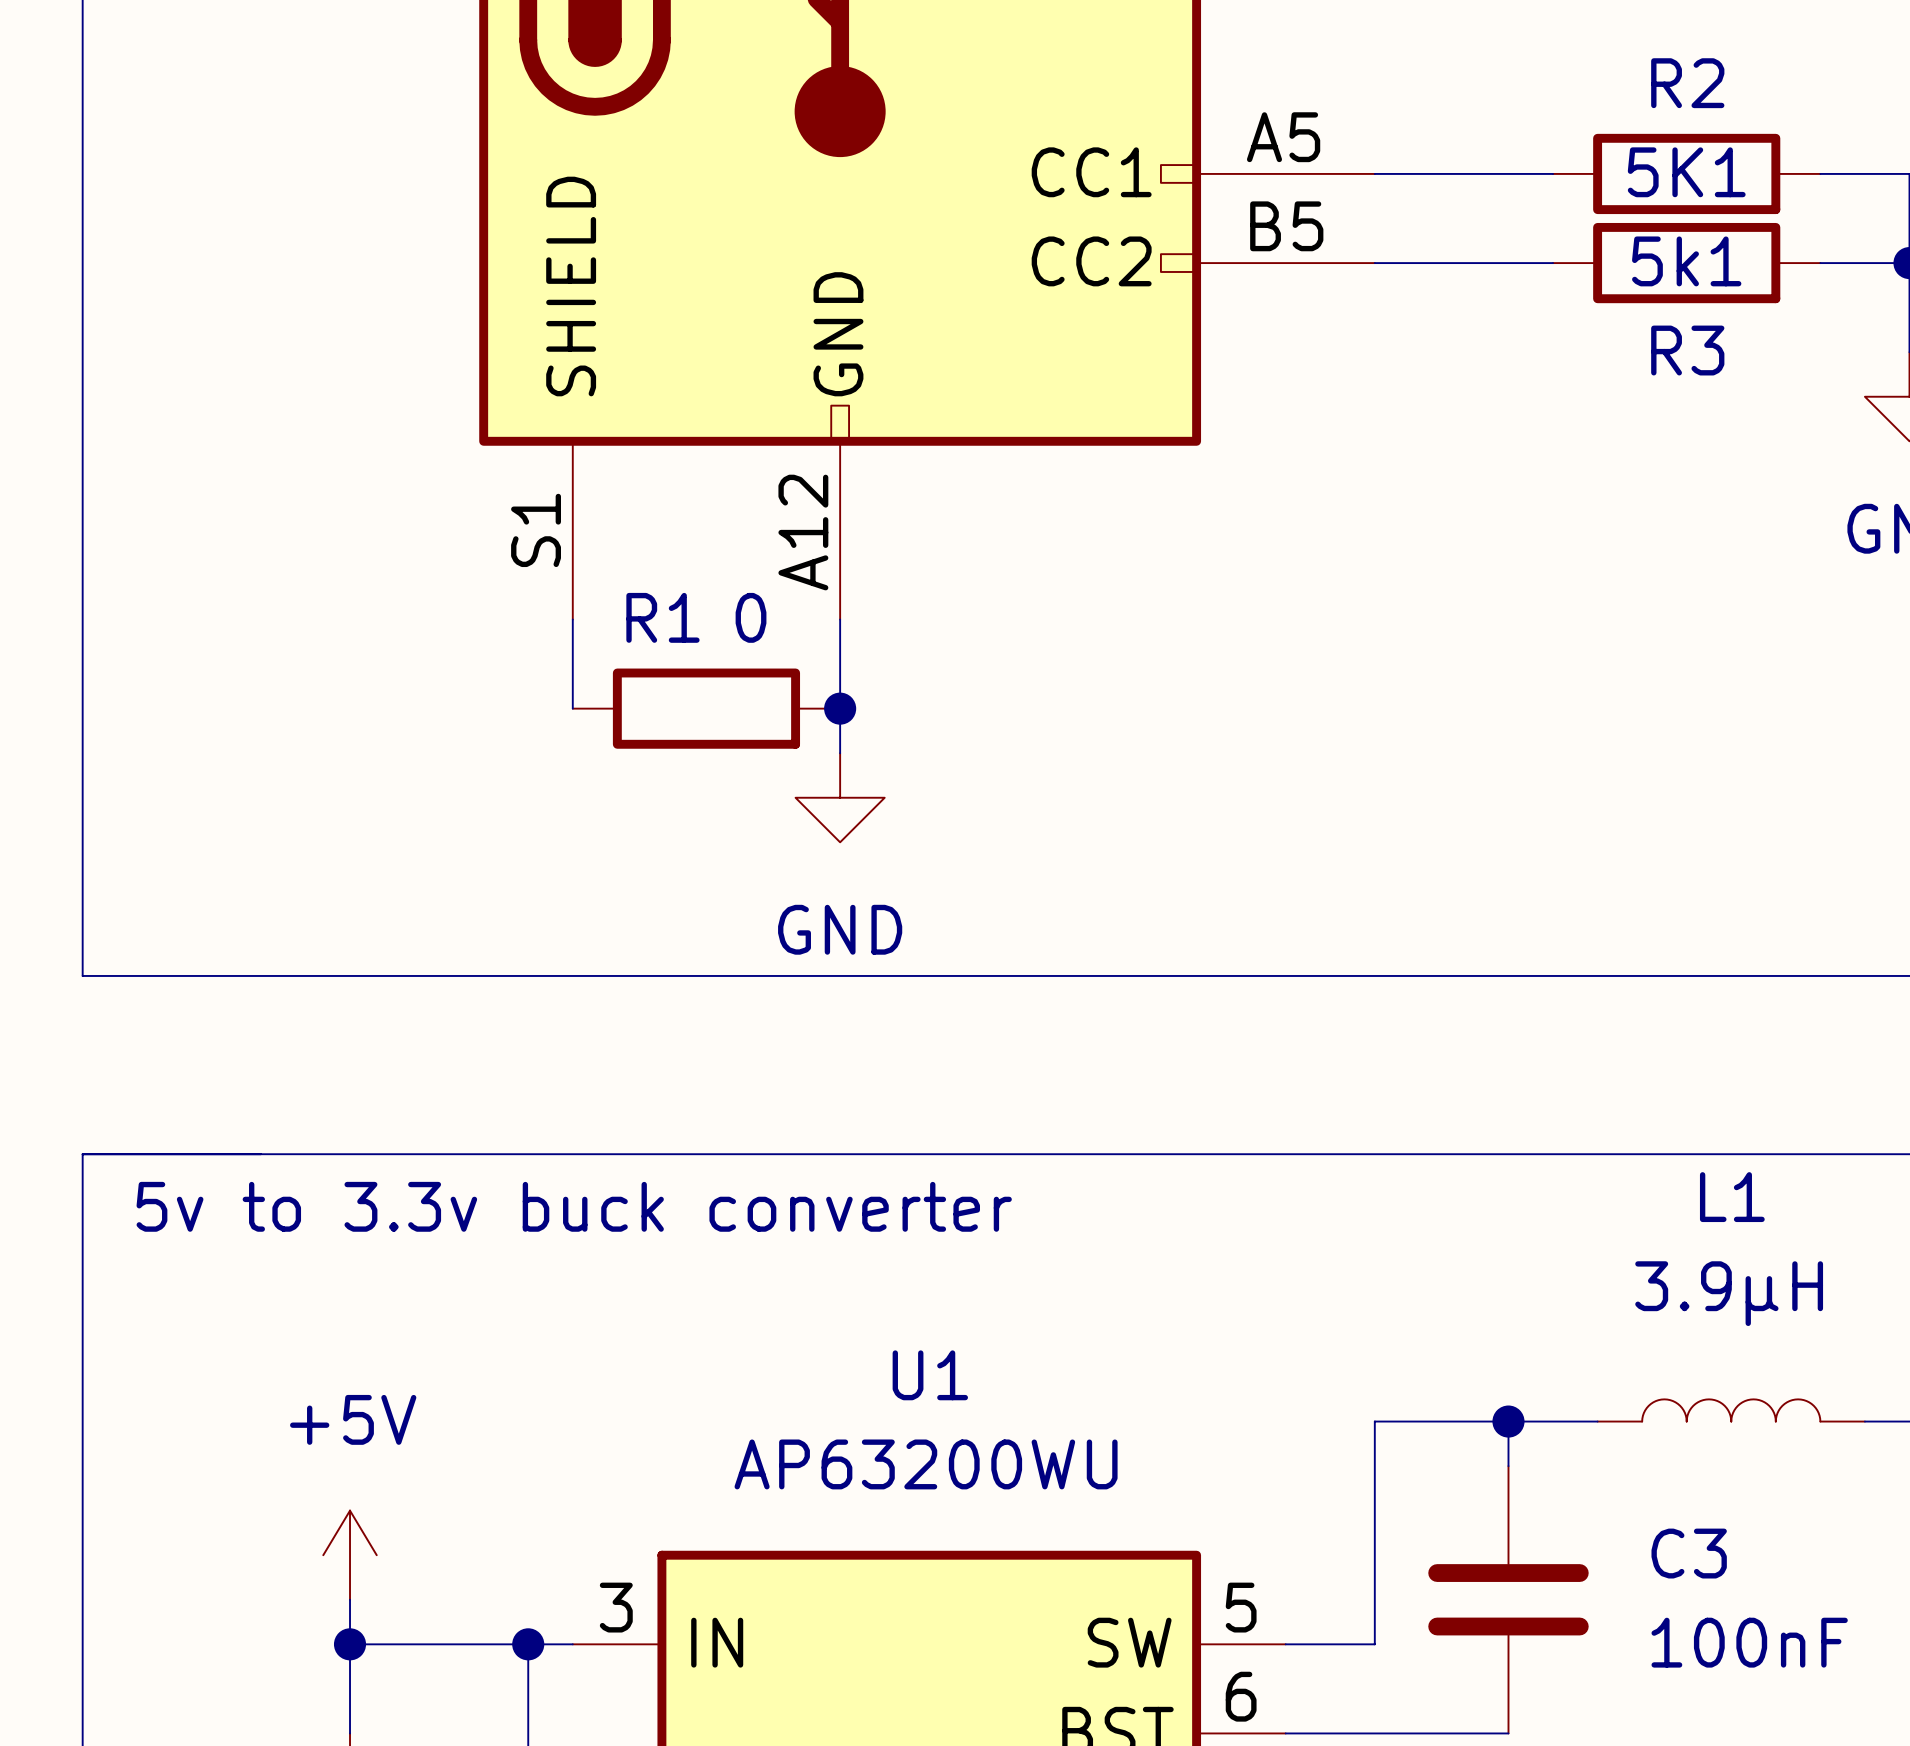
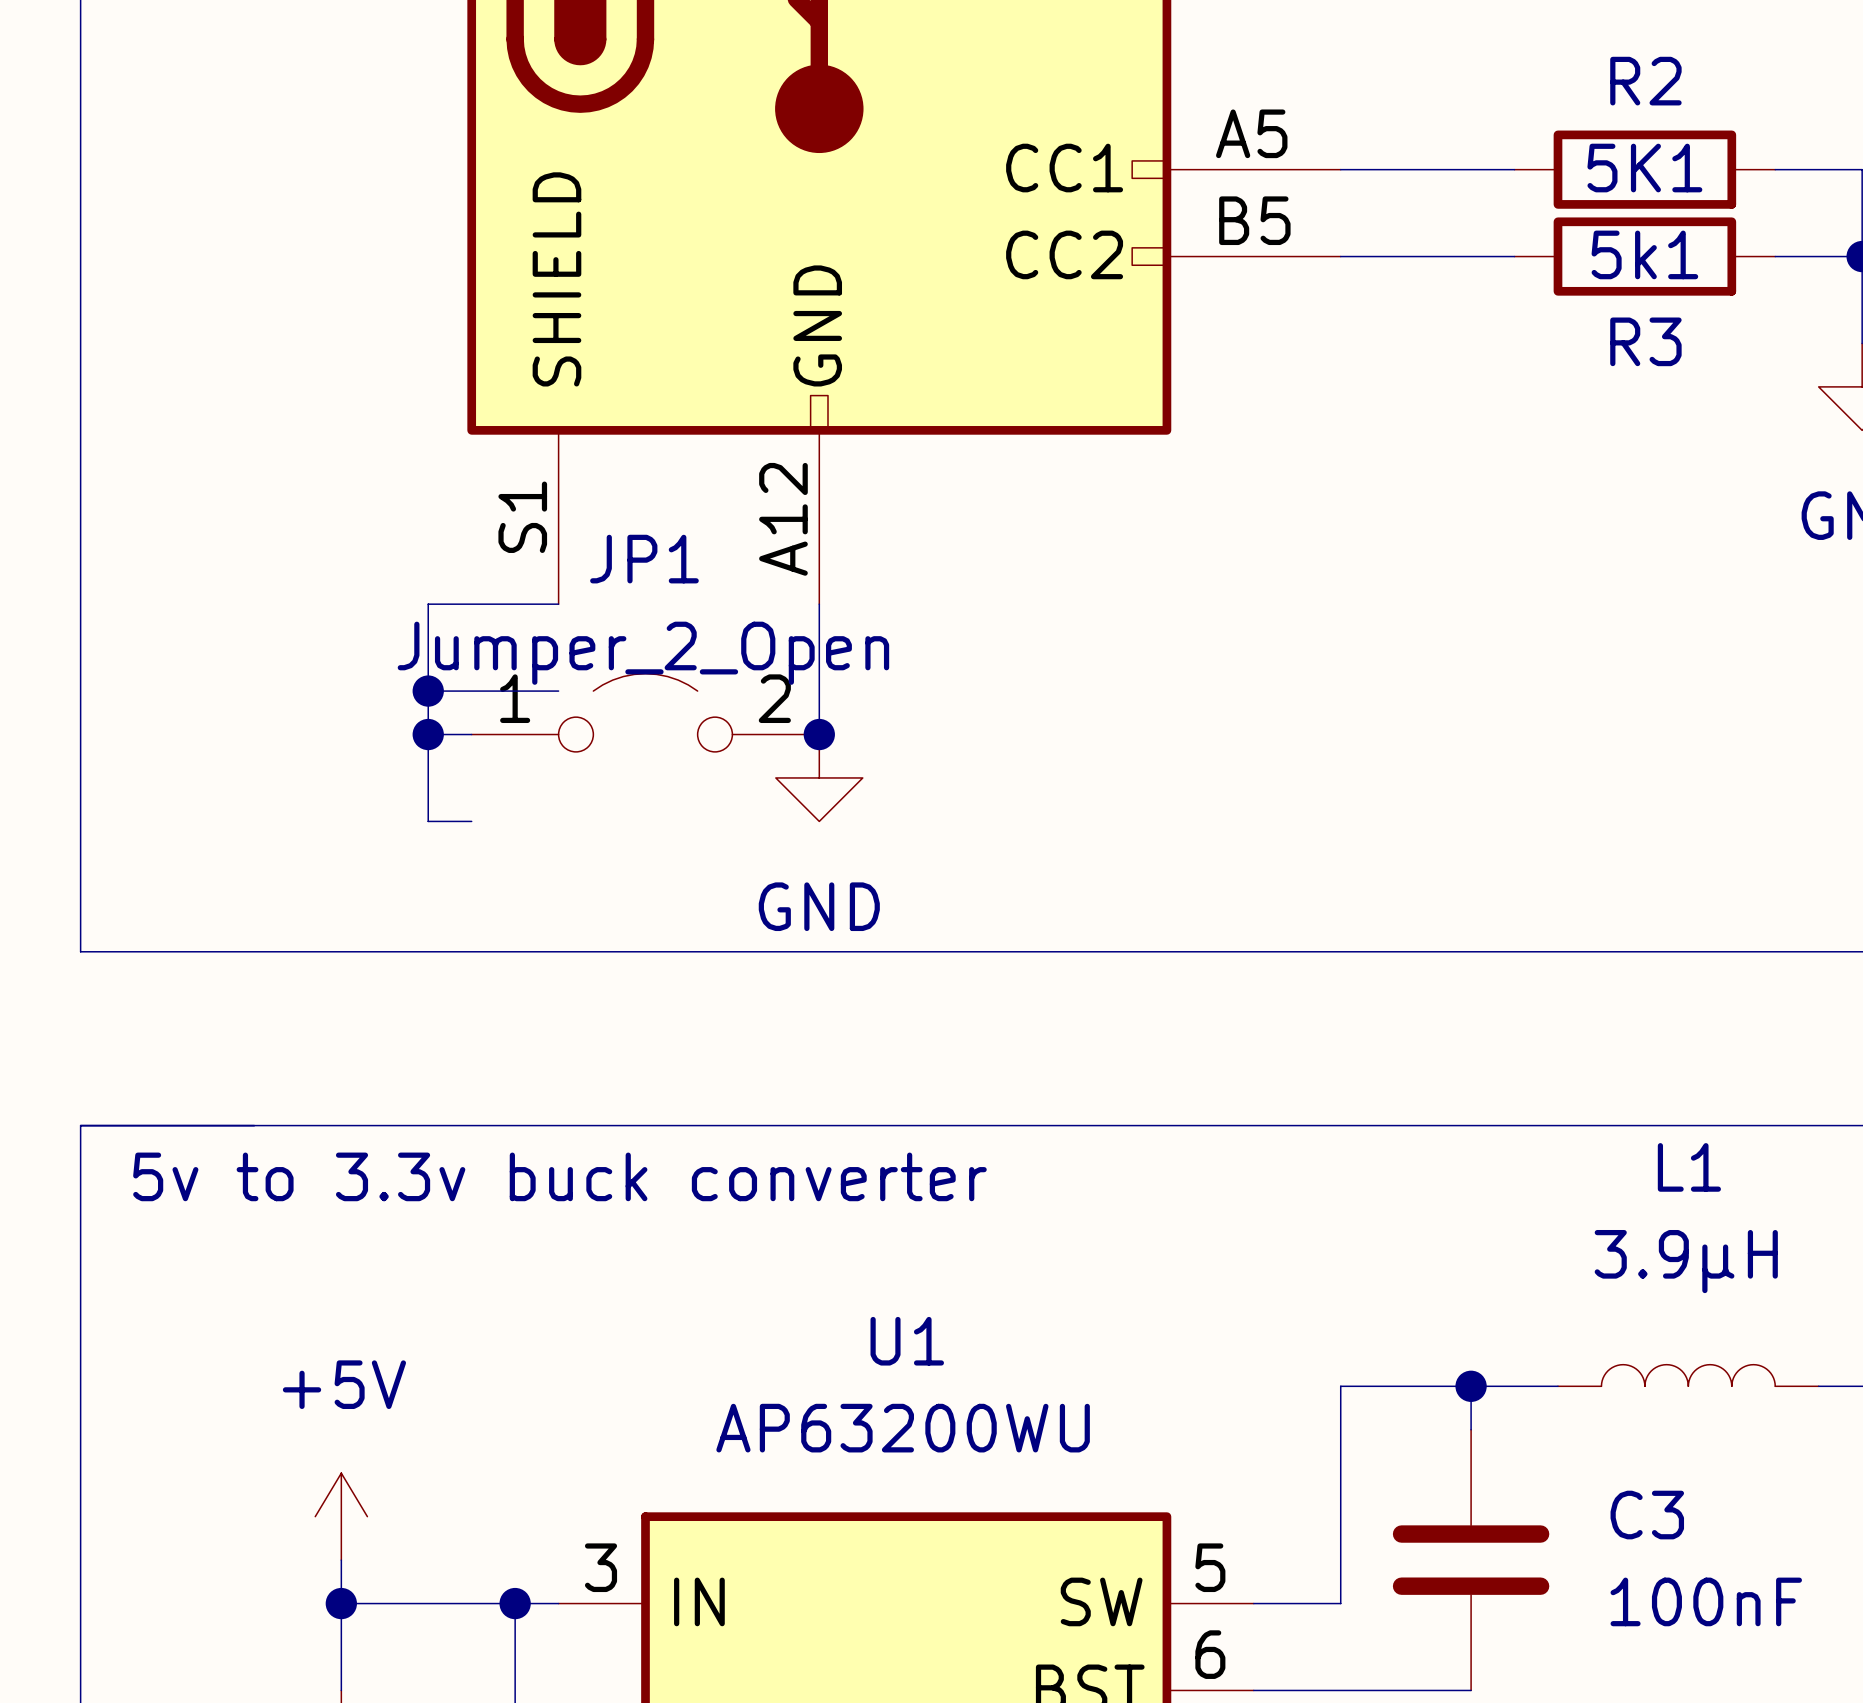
wire: (572, 619) (572, 708) -> (558, 604) (428, 604) (428, 821) (471, 821)
wire: none -> (428, 691) (558, 691)
junction: none -> (428, 691)
R1: 0 (706, 708) -> none
junction position: (840, 708) -> (819, 734)
JP1: none -> Jumper_2_Open (645, 712)
wire: none -> (428, 734) (471, 734)
junction: none -> (428, 734)

